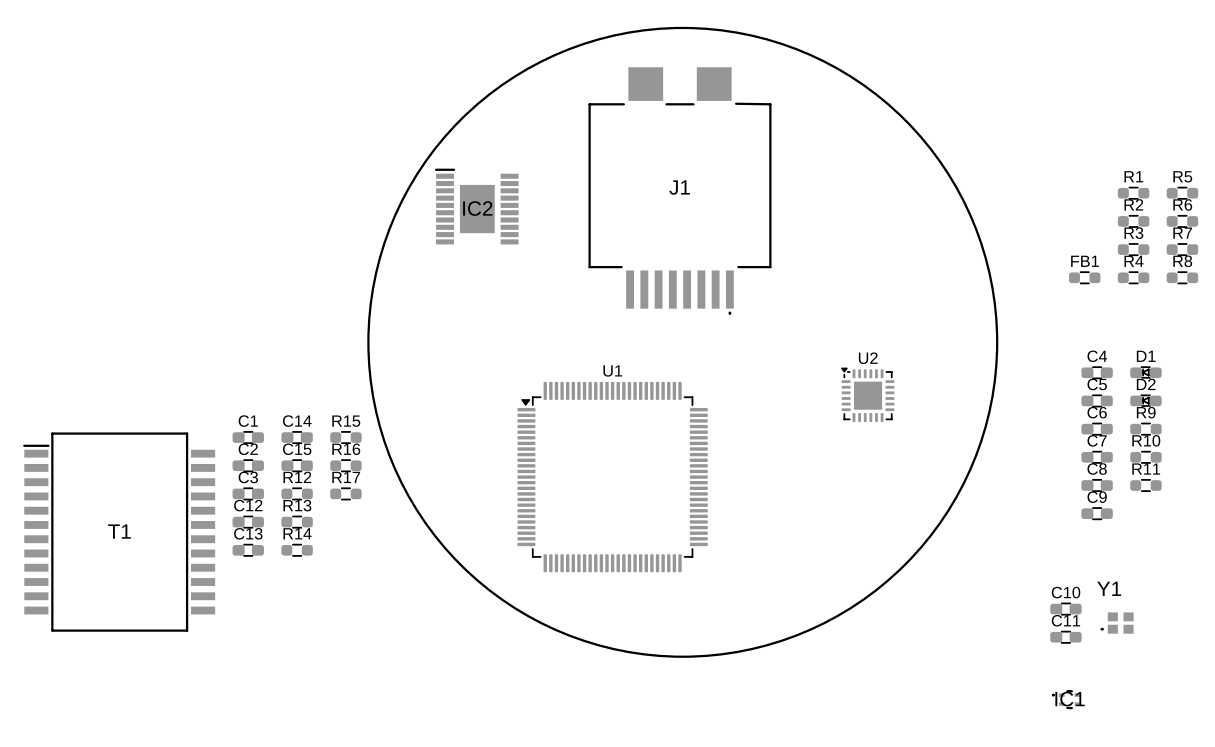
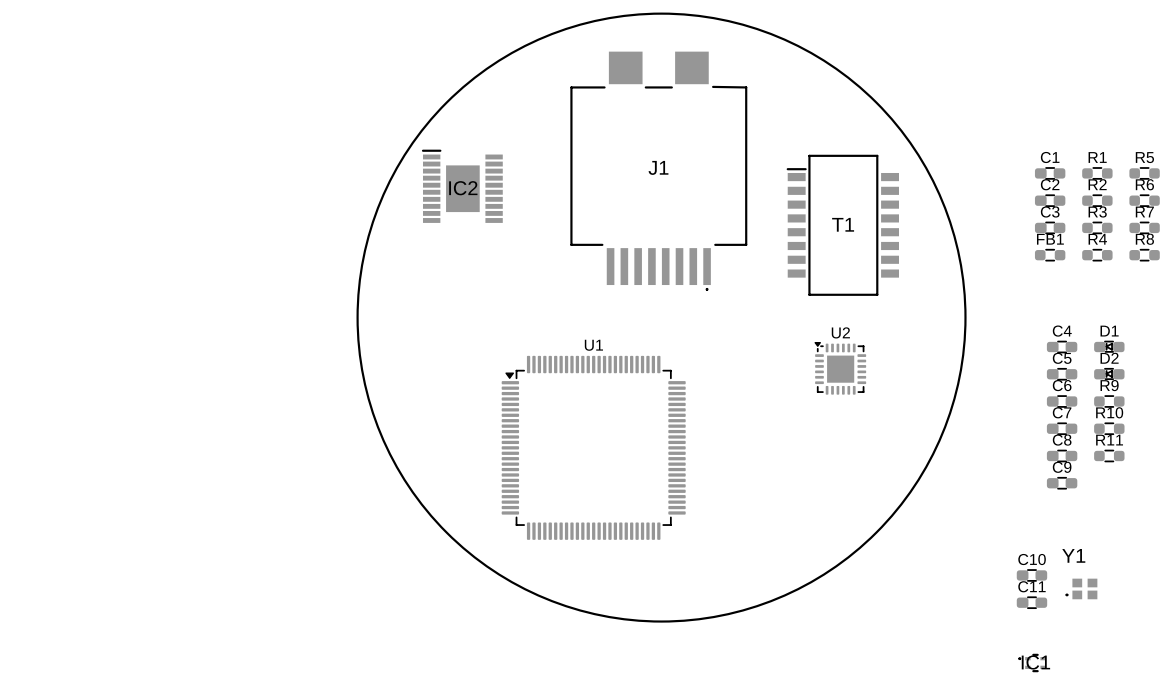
T1 footprint: [23, 432, 216, 632] -> [786, 154, 899, 296]
C1 position: (248, 437) -> (1050, 173)
C14: (297, 437) -> none
R15: (345, 437) -> none
C2 position: (248, 465) -> (1050, 200)
C15: (297, 465) -> none
R16: (345, 465) -> none
C3 position: (248, 493) -> (1050, 227)
R12: (297, 493) -> none
R17: (345, 493) -> none
C12: (248, 522) -> none
R13: (297, 522) -> none
C13: (248, 550) -> none
R14: (297, 550) -> none

